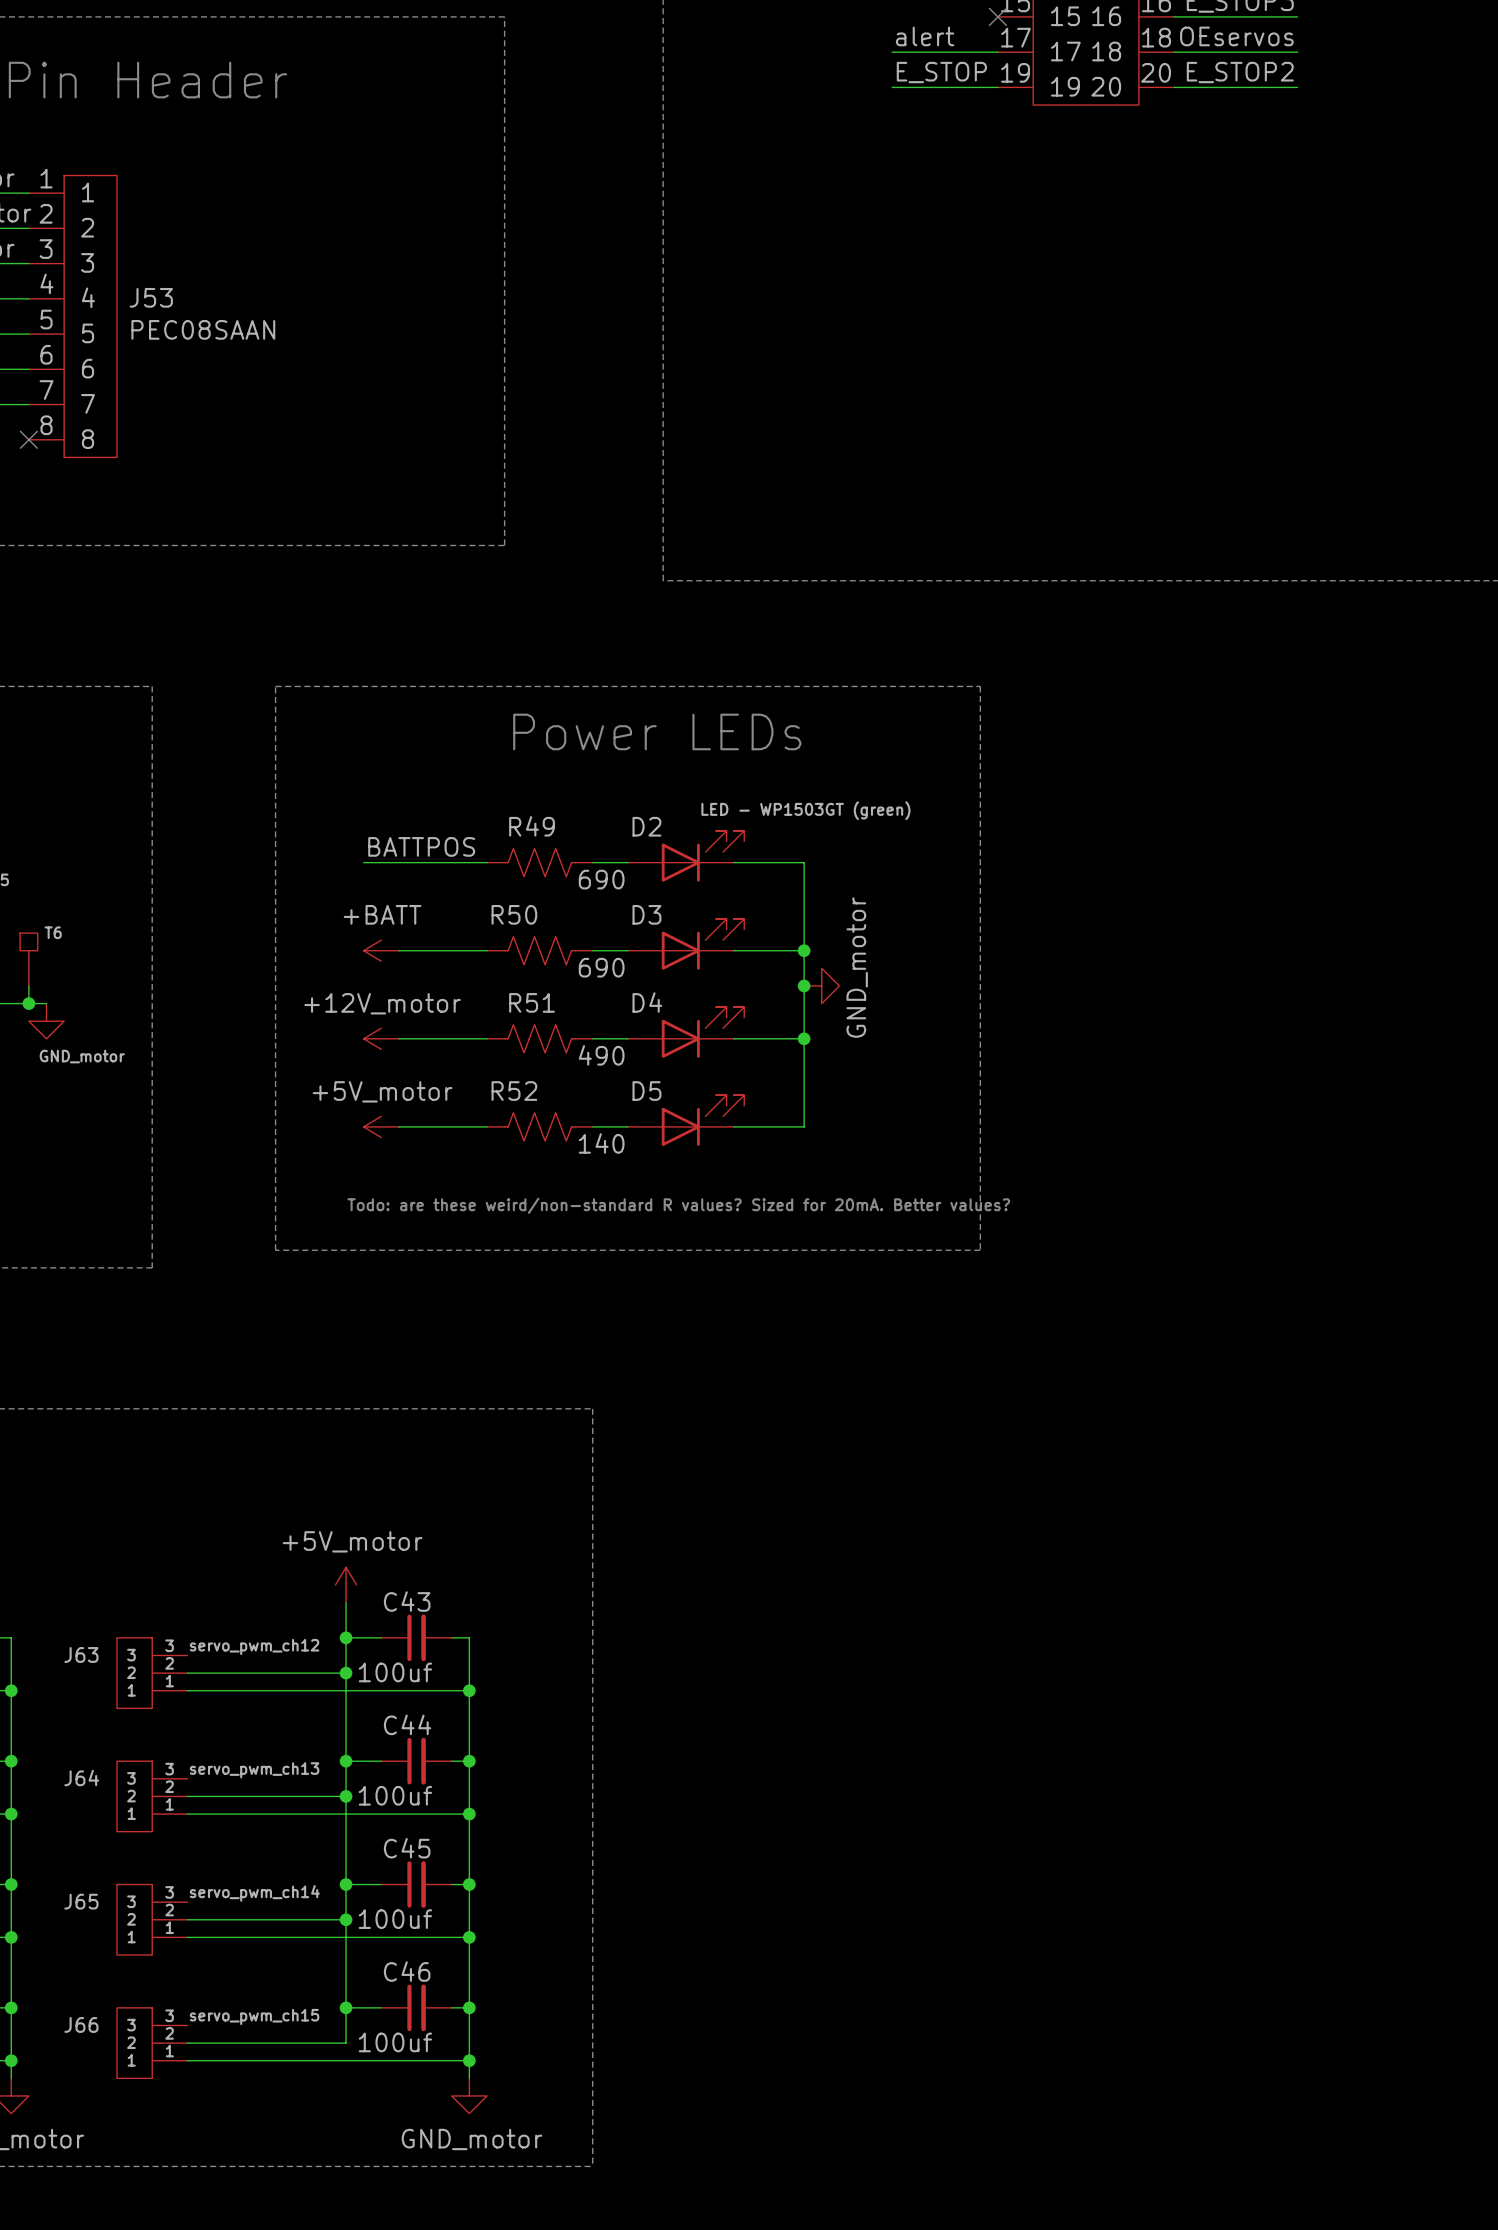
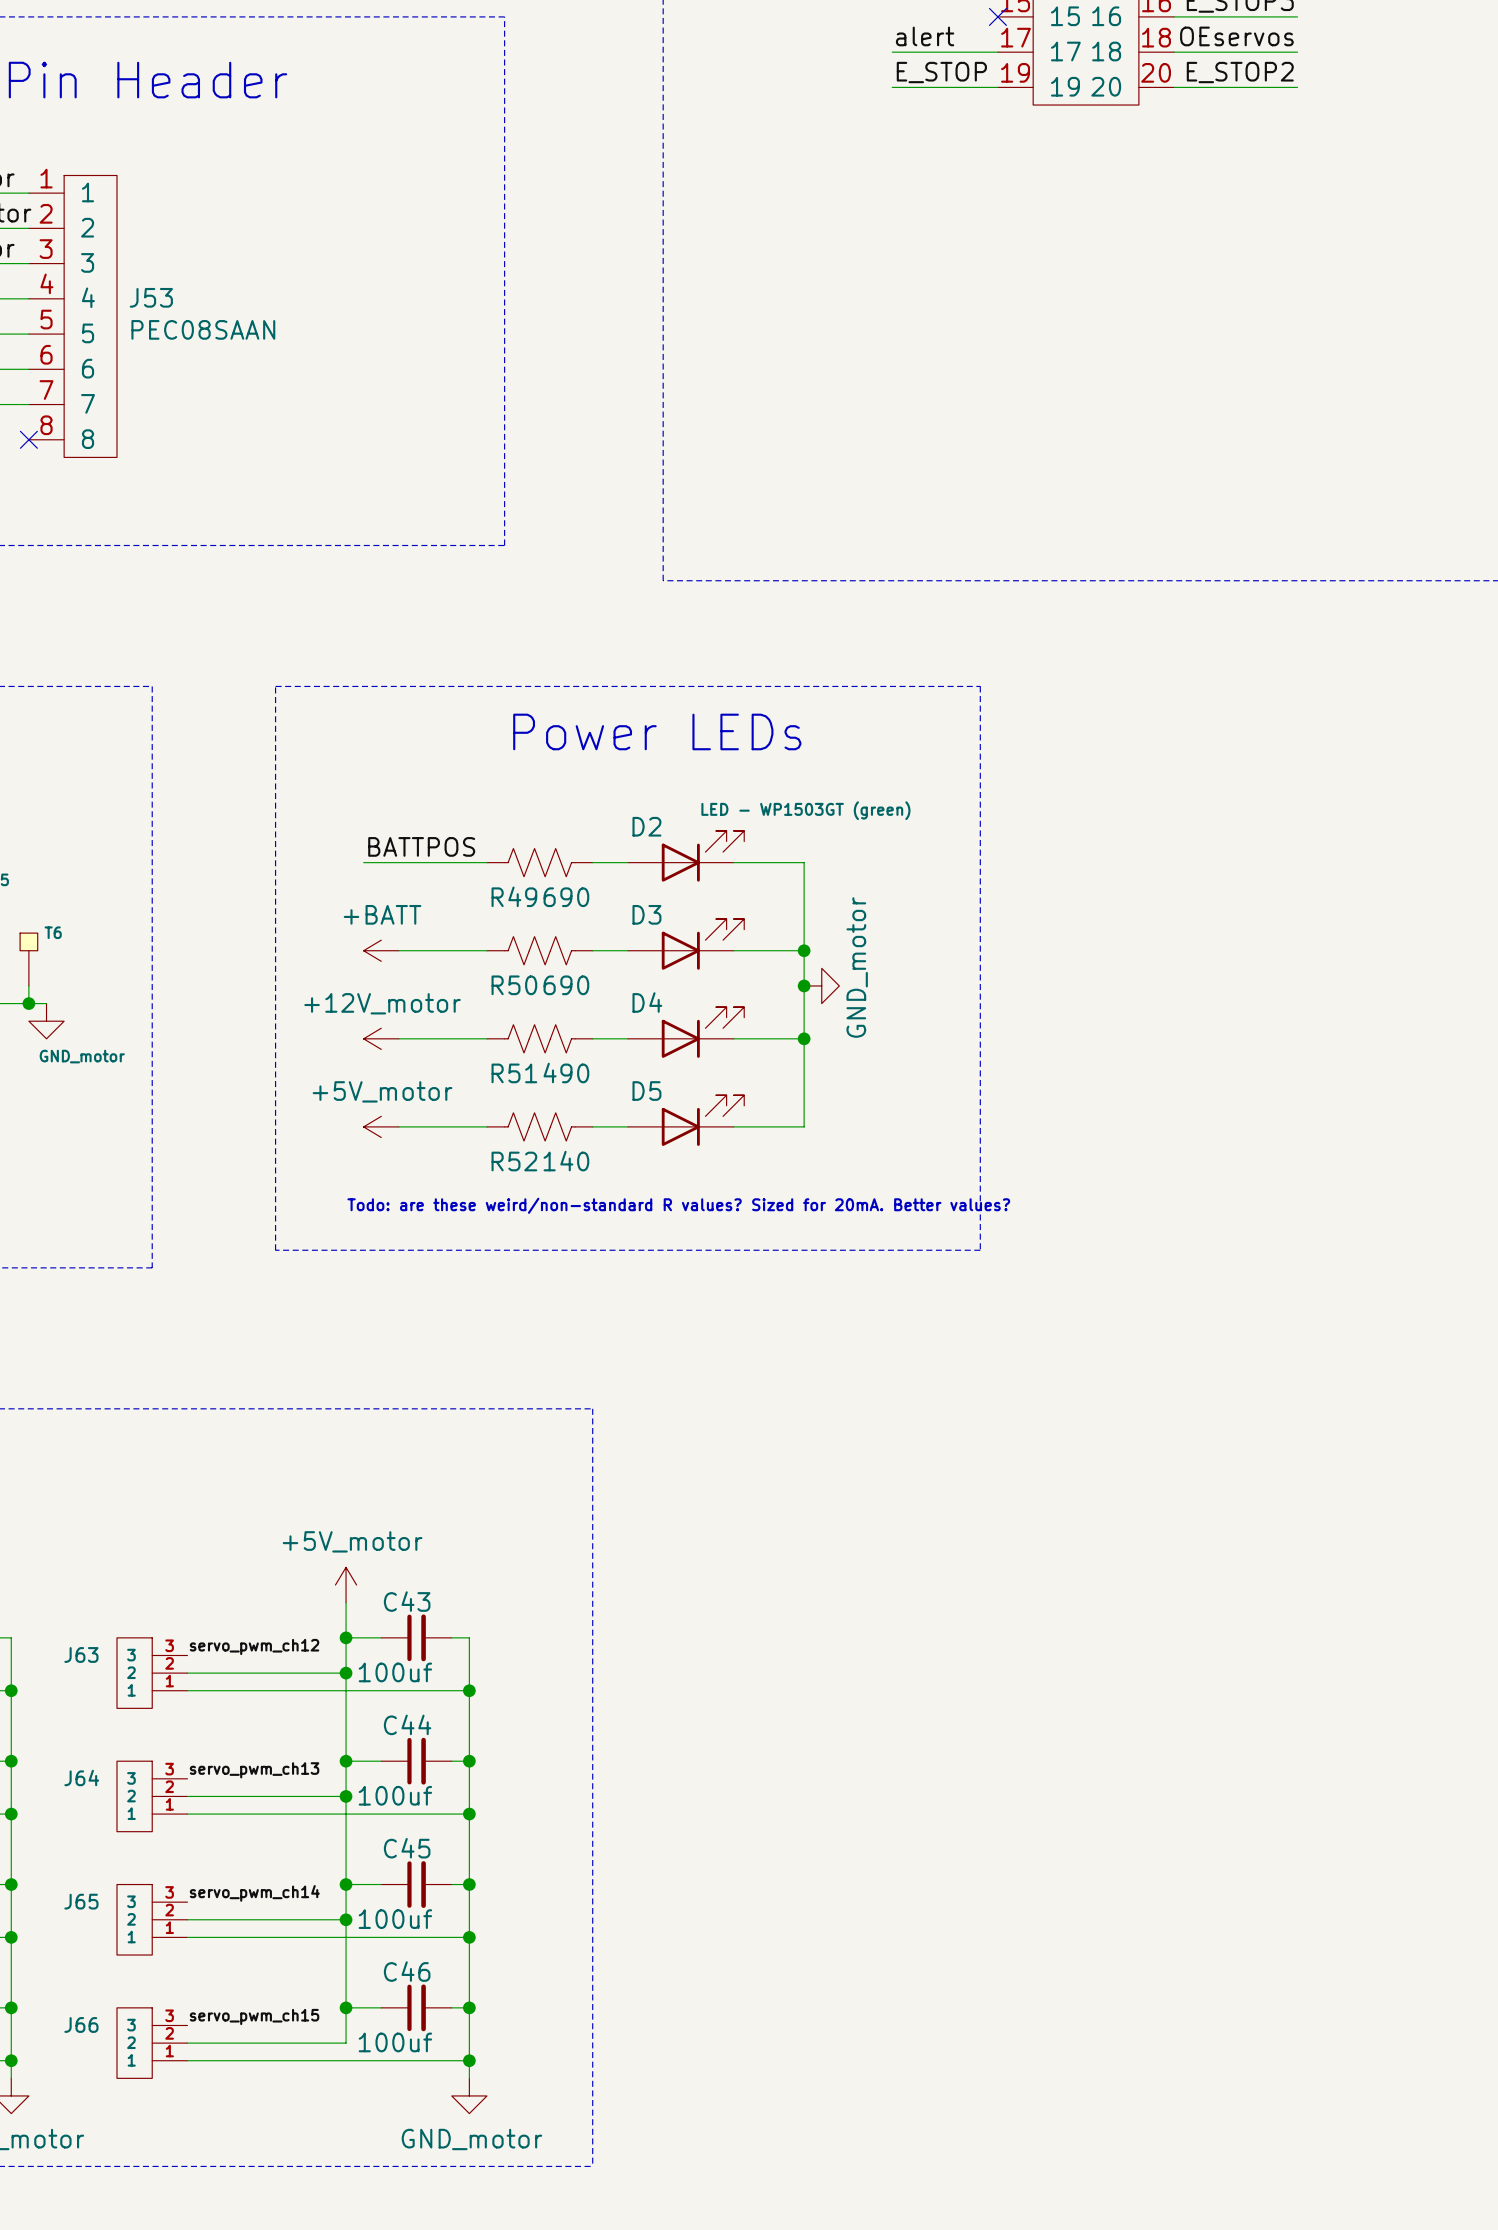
R49 name position: R49 (532, 826) -> R49 (514, 896)
R49 value position: 690 (601, 879) -> 690 (566, 897)
R50 name position: R50 (514, 914) -> R50 (514, 985)
R50 value position: 690 (601, 967) -> 690 (566, 985)
R51 name position: R51 (532, 1002) -> R51 (514, 1073)
R51 value position: 490 (601, 1055) -> 490 (566, 1072)
R52 name position: R52 (514, 1091) -> R52 (514, 1161)
R52 value position: 140 (601, 1143) -> 140 (566, 1161)

